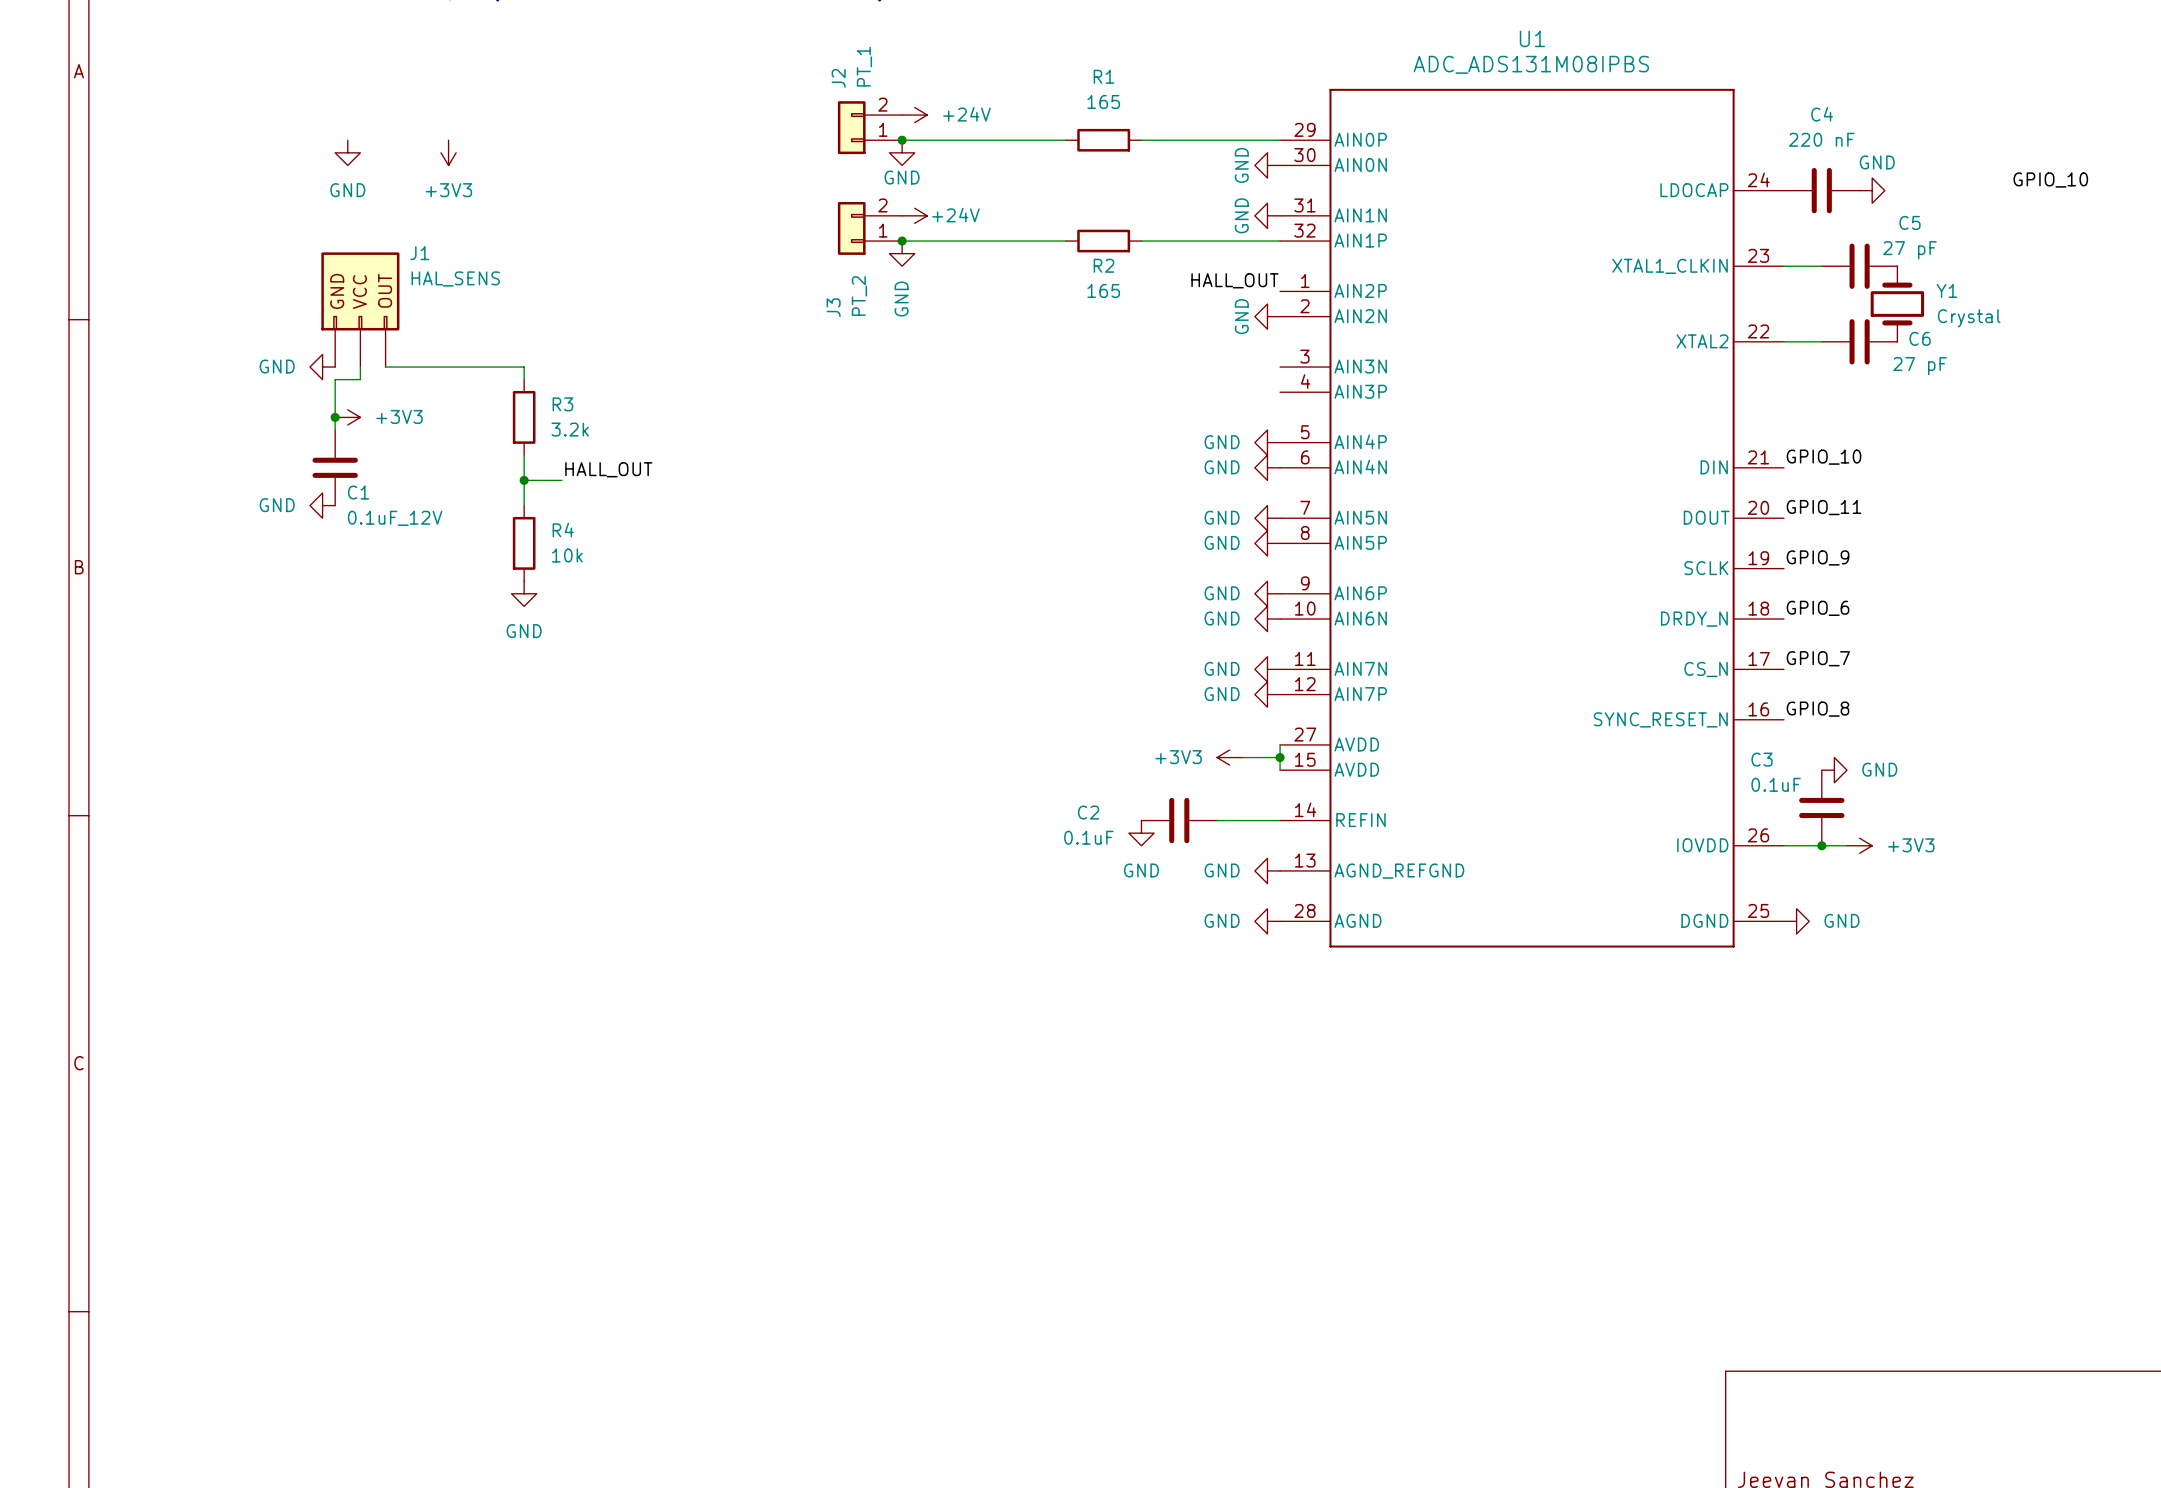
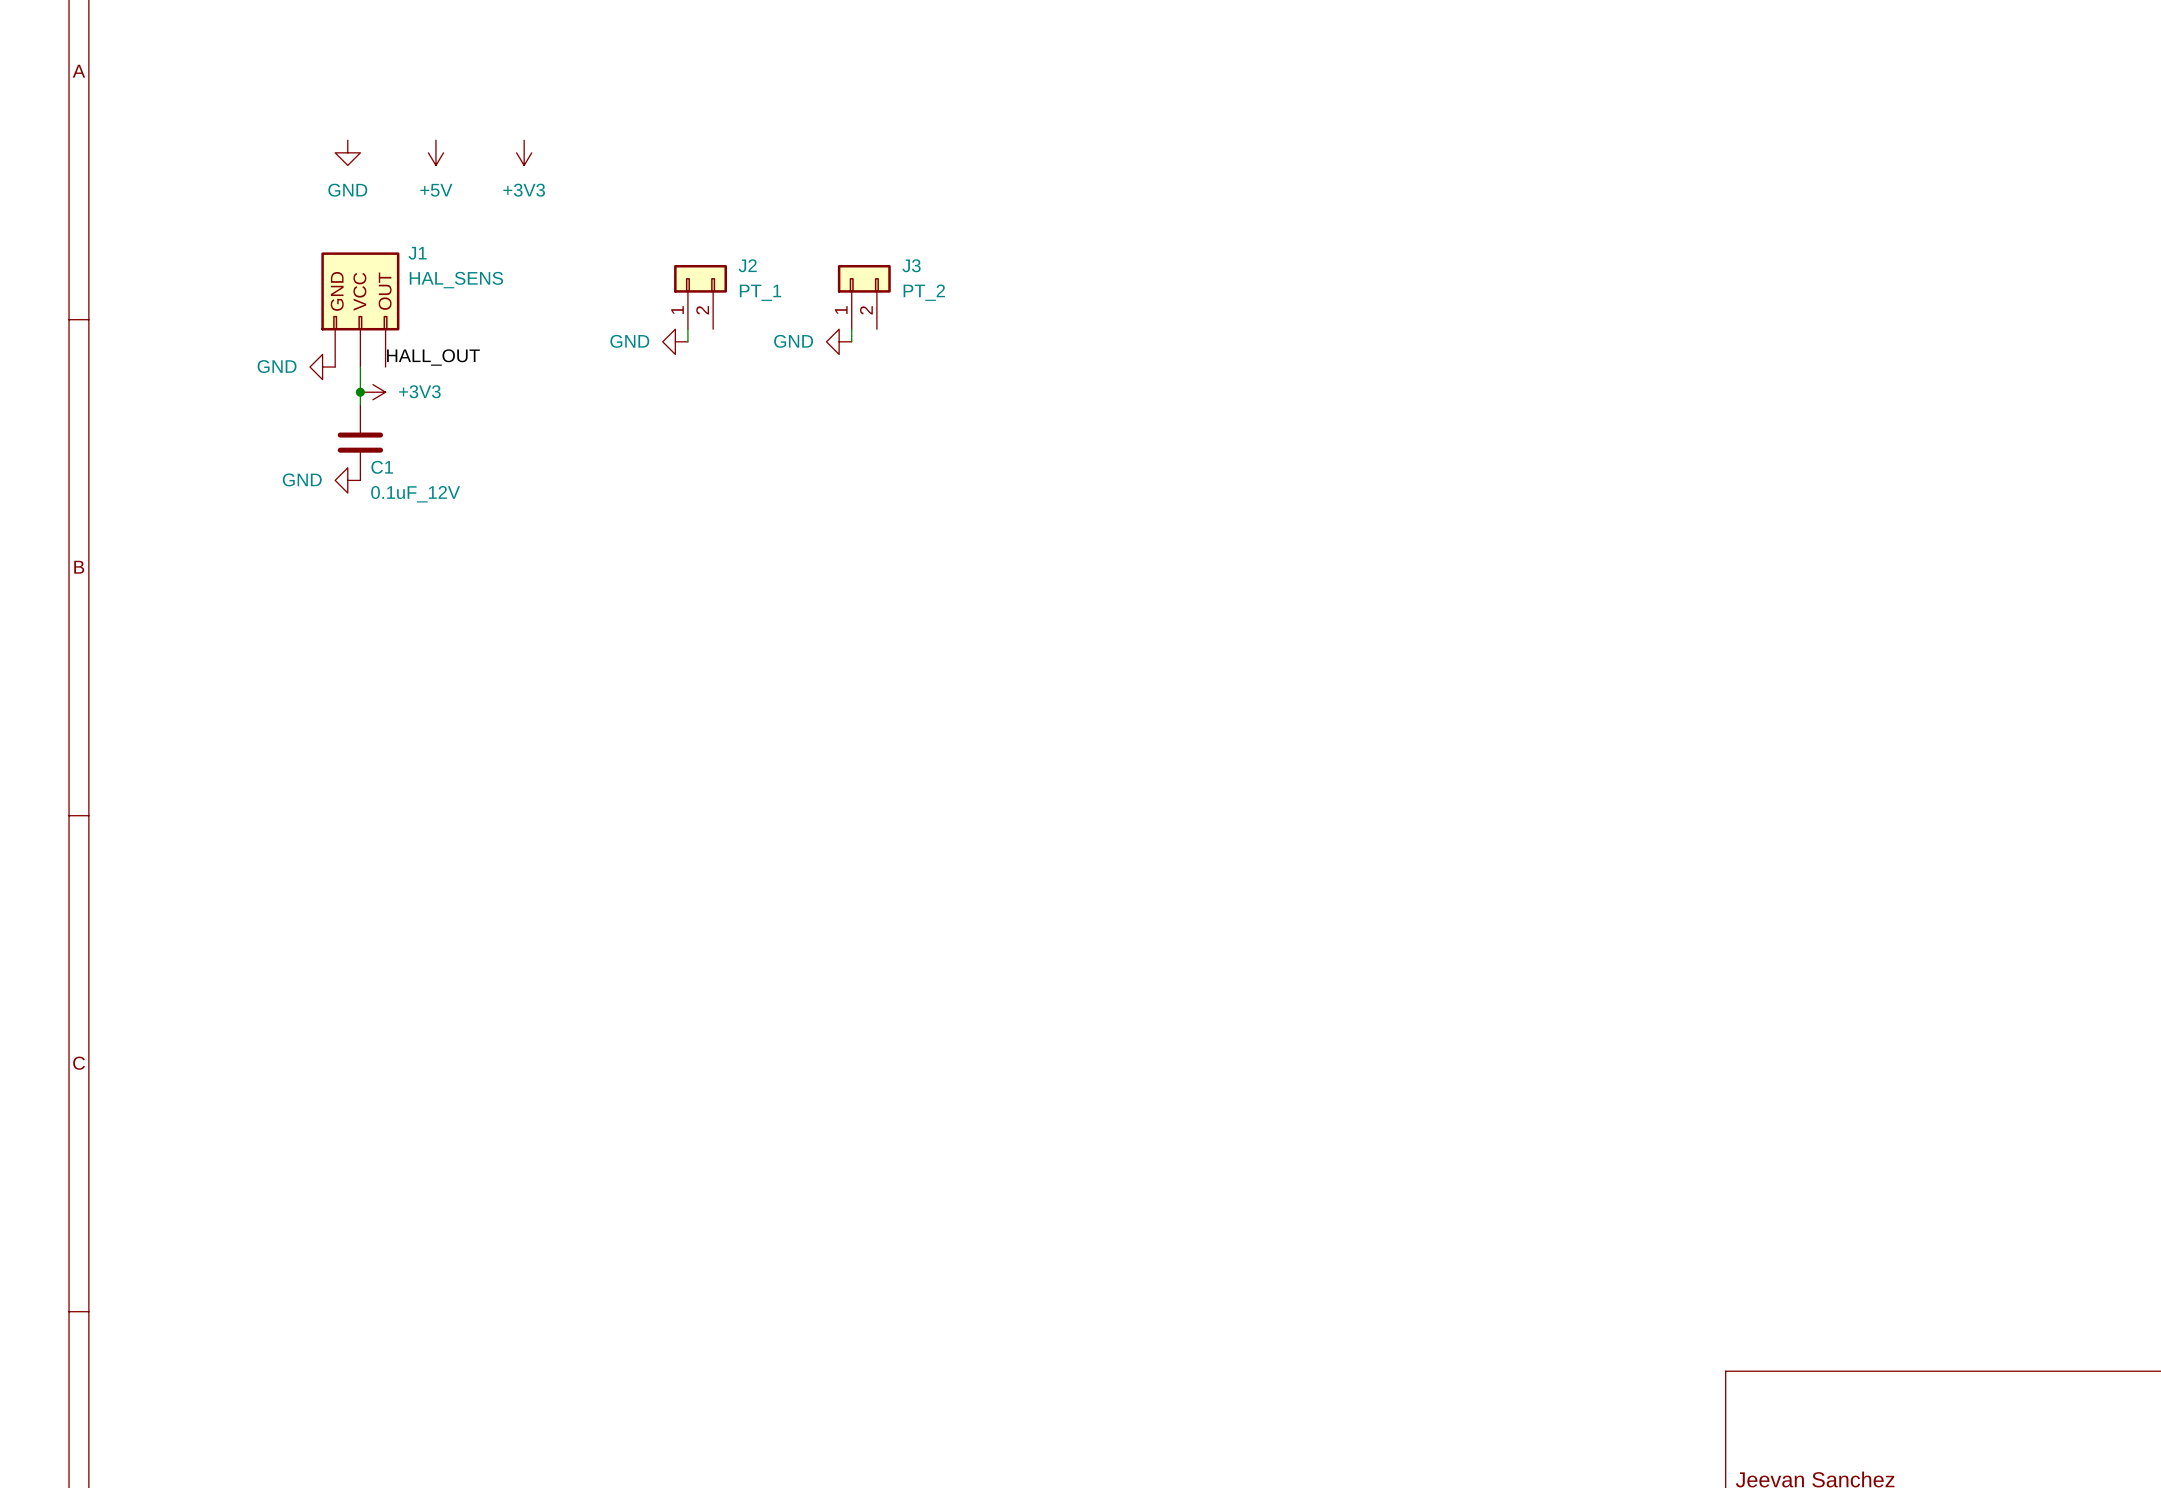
power symbol: +24V (914, 115) -> none
J2 rotation: 0° (851, 127) -> 90° clockwise (700, 278)
J2 position: (869, 127) -> (700, 297)
wire: (902, 140) (1065, 140) -> none
junction: (902, 140) -> none
R1: 165 (1103, 140) -> none
wire: (1141, 140) (1280, 140) -> none
power symbol: none -> +5V (435, 152)
power symbol position: +3V3 (448, 152) -> +3V3 (524, 152)
power symbol: GND (902, 152) -> none
power symbol: GND (1267, 165) -> none
label: GPIO_10 (2050, 180) -> none
C4: 220 nF (1821, 190) -> none
power symbol: GND (1872, 190) -> none
power symbol: +24V (914, 215) -> none
power symbol: GND (1267, 215) -> none
J3 rotation: 0° (851, 228) -> 90° clockwise (864, 278)
J3 position: (869, 228) -> (864, 297)
wire: (902, 241) (1065, 241) -> none
junction: (902, 241) -> none
R2: 165 (1103, 241) -> none
wire: (1141, 241) (1280, 241) -> none
power symbol: GND (902, 253) -> none
wire: (1784, 266) (1821, 266) -> none
C5: 27 pF (1859, 266) -> none
label: HALL_OUT (1234, 280) -> none
J3 value position: PT_2 (859, 295) -> PT_2 (924, 292)
Y1: Crystal (1897, 304) -> none
J3 name position: J3 (833, 307) -> J3 (911, 265)
power symbol: GND (1267, 316) -> none
wire: none -> (687, 329) (687, 341)
wire: none -> (851, 329) (851, 341)
power symbol: none -> GND (675, 341)
power symbol: none -> GND (839, 341)
wire: (1784, 341) (1821, 341) -> none
C6: 27 pF (1859, 341) -> none
wire: (385, 367) (524, 367) (524, 379) -> none
wire: (360, 379) (335, 379) (335, 430) -> (360, 379) (360, 404)
junction position: (335, 417) -> (360, 392)
power symbol position: +3V3 (347, 417) -> +3V3 (372, 392)
R3: 3.2k (524, 417) -> none
power symbol: GND (1267, 442) -> none
wire: (524, 455) (524, 505) -> none
label: GPIO_10 (1823, 457) -> none
C1 position: (335, 467) -> (360, 442)
power symbol: GND (1267, 467) -> none
label position: HALL_OUT (608, 469) -> HALL_OUT (433, 357)
wire: (524, 480) (561, 480) -> none
junction: (524, 480) -> none
power symbol position: GND (322, 505) -> GND (347, 480)
label: GPIO_11 (1823, 507) -> none
power symbol: GND (1267, 518) -> none
U1: ADC_ADS131M08IPBS (1532, 518) -> none
R4: 10k (524, 543) -> none
power symbol: GND (1267, 543) -> none
label: GPIO_9 (1817, 557) -> none
power symbol: GND (524, 593) -> none
power symbol: GND (1267, 593) -> none
label: GPIO_6 (1817, 608) -> none
power symbol: GND (1267, 618) -> none
label: GPIO_7 (1818, 658) -> none
power symbol: GND (1267, 669) -> none
power symbol: GND (1267, 694) -> none
label: GPIO_8 (1817, 709) -> none
wire: (1280, 744) (1280, 770) -> none
power symbol: +3V3 (1229, 757) -> none
wire: (1242, 757) (1280, 757) -> none
junction: (1280, 757) -> none
power symbol: GND (1834, 770) -> none
C3: 0.1uF (1821, 807) -> none
C2: 0.1uF (1179, 820) -> none
wire: (1217, 820) (1280, 820) -> none
power symbol: GND (1141, 833) -> none
wire: (1784, 845) (1846, 845) -> none
junction: (1821, 845) -> none
power symbol: +3V3 (1859, 845) -> none
power symbol: GND (1267, 870) -> none
power symbol: GND (1267, 921) -> none
power symbol: GND (1796, 921) -> none

